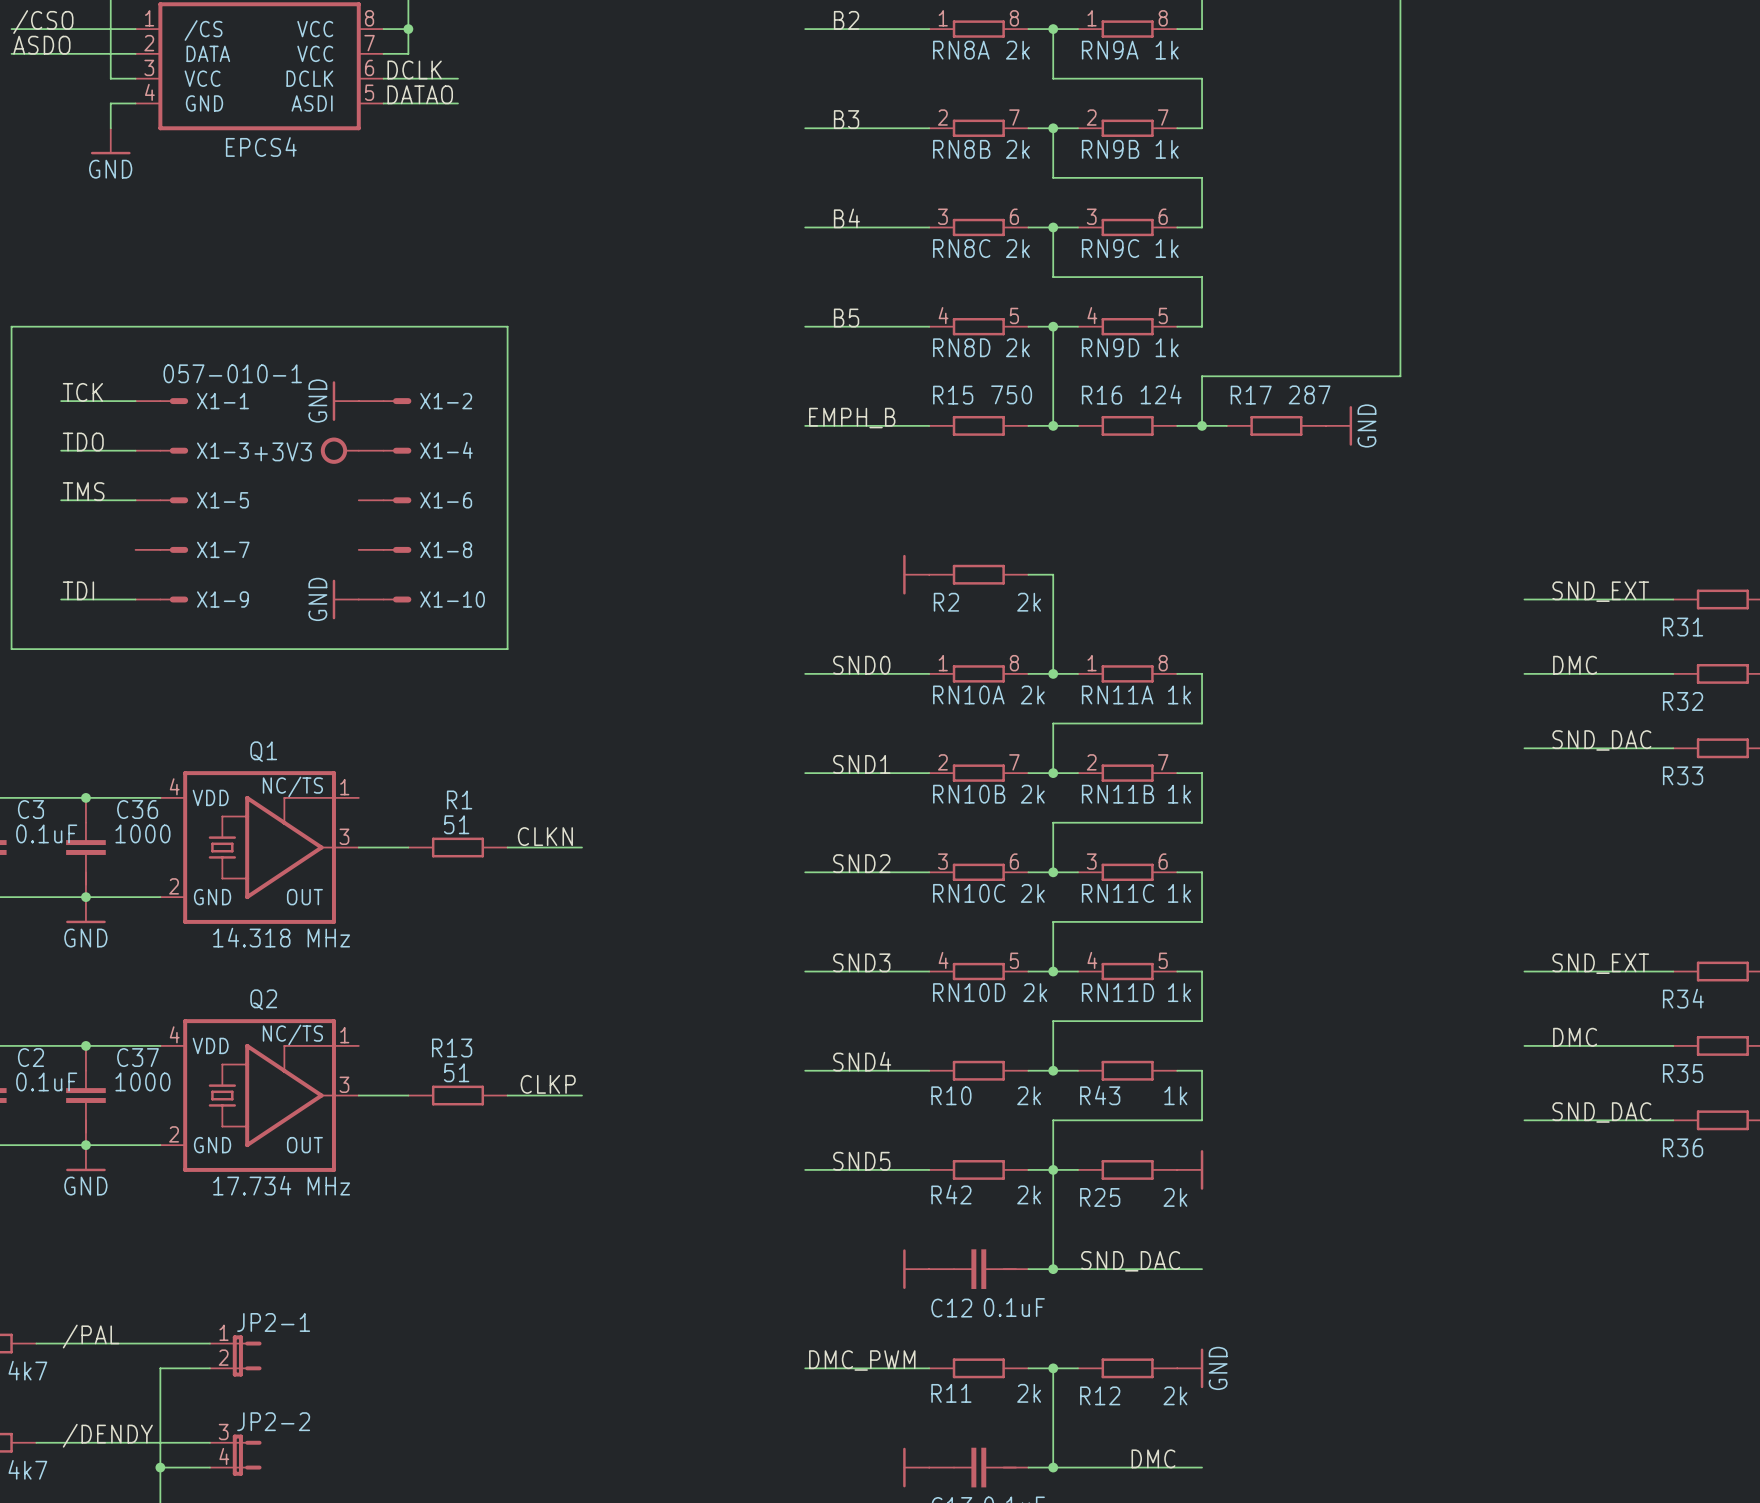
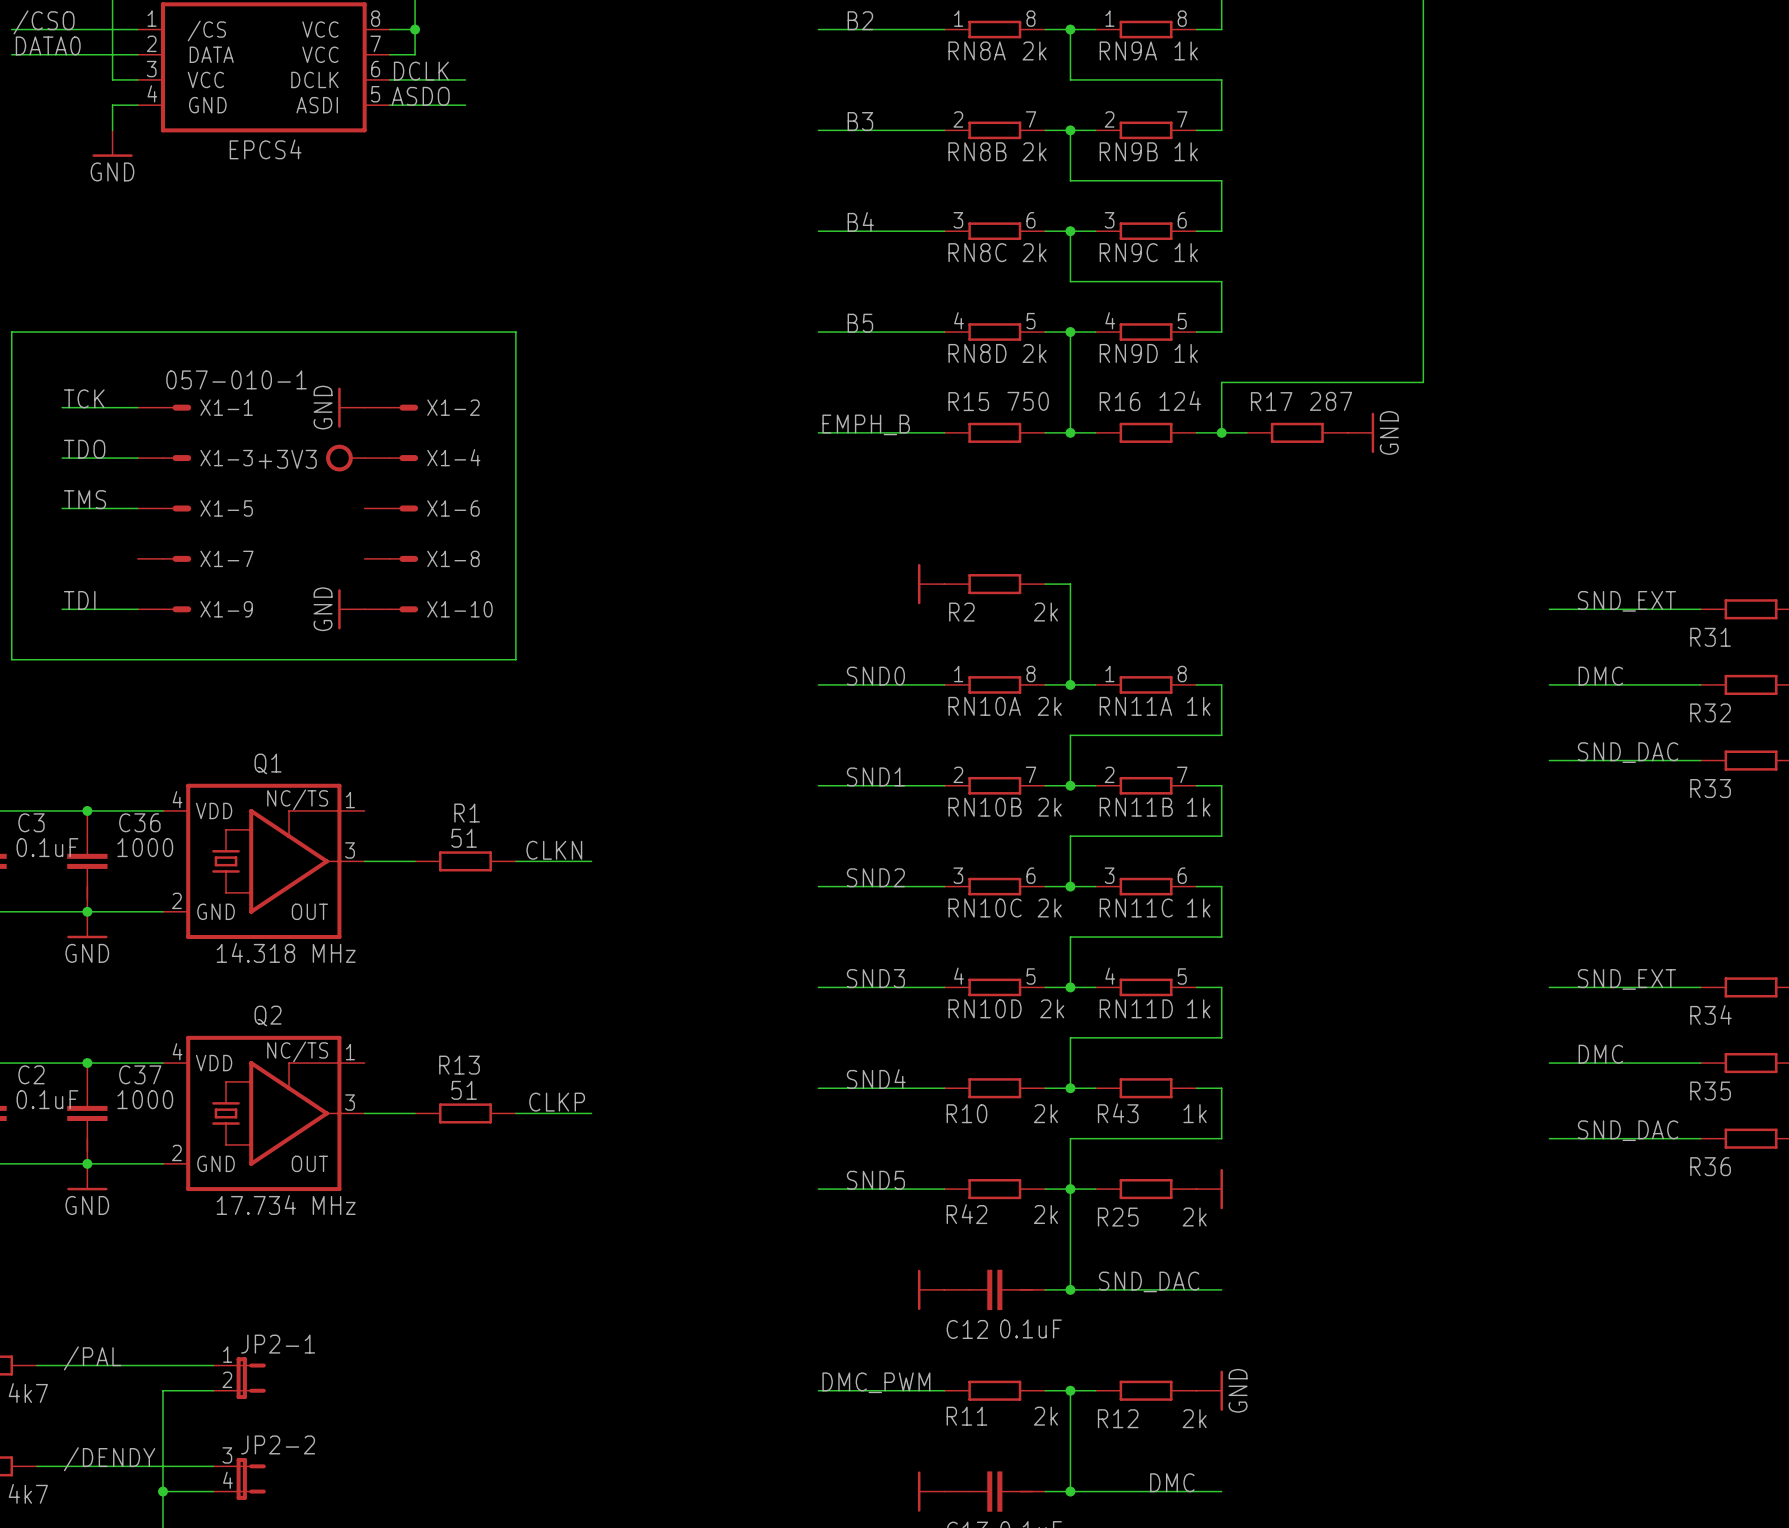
label: ASDO (41, 45) -> DATA0 (48, 45)
label: DATAO (420, 94) -> ASDO (420, 96)

